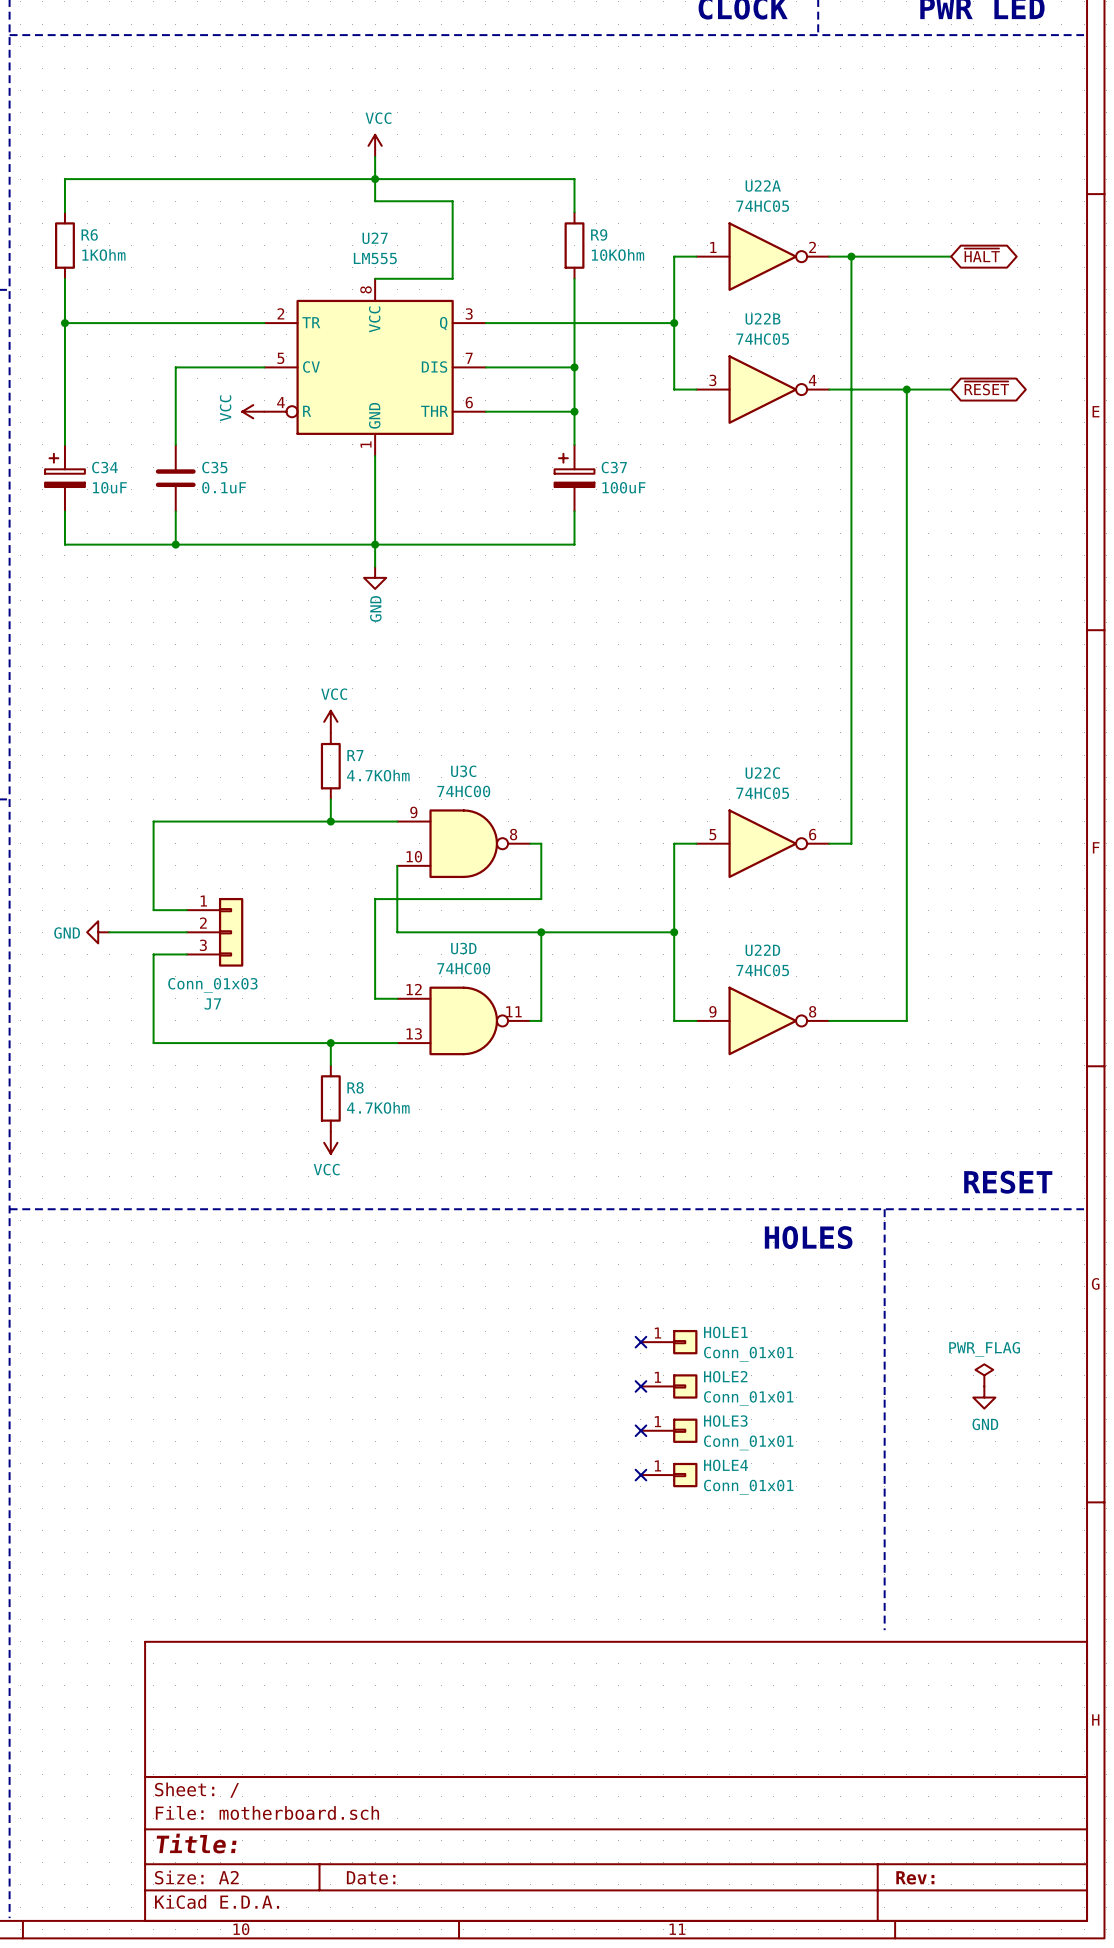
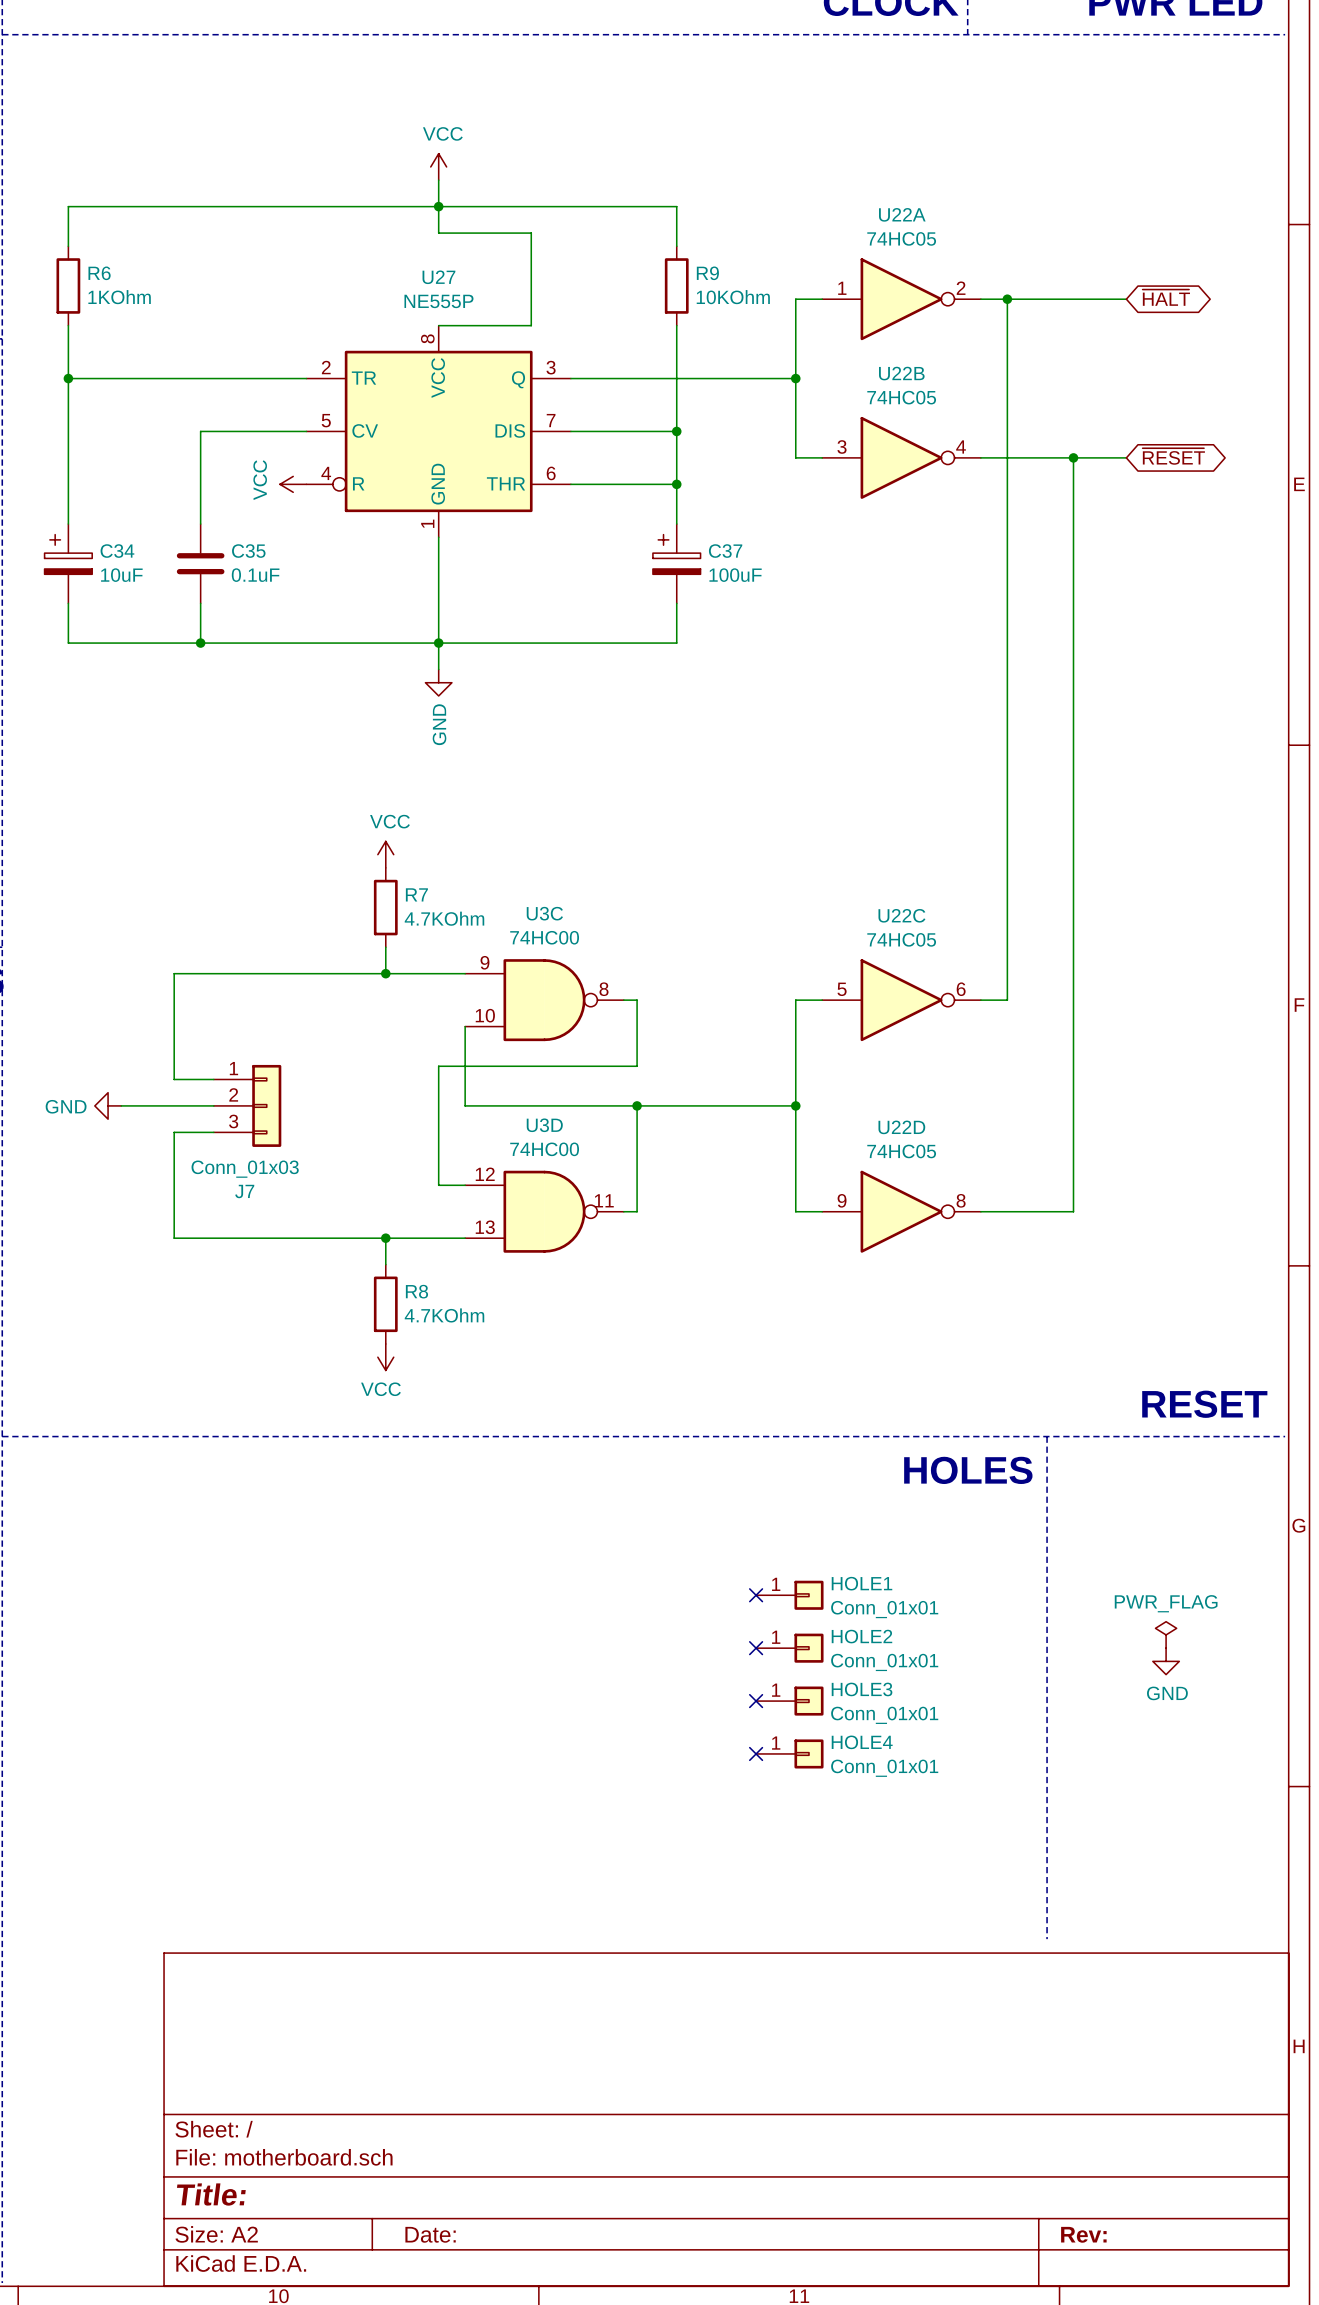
U27 value: LM555 (375, 258) -> NE555P (438, 301)

